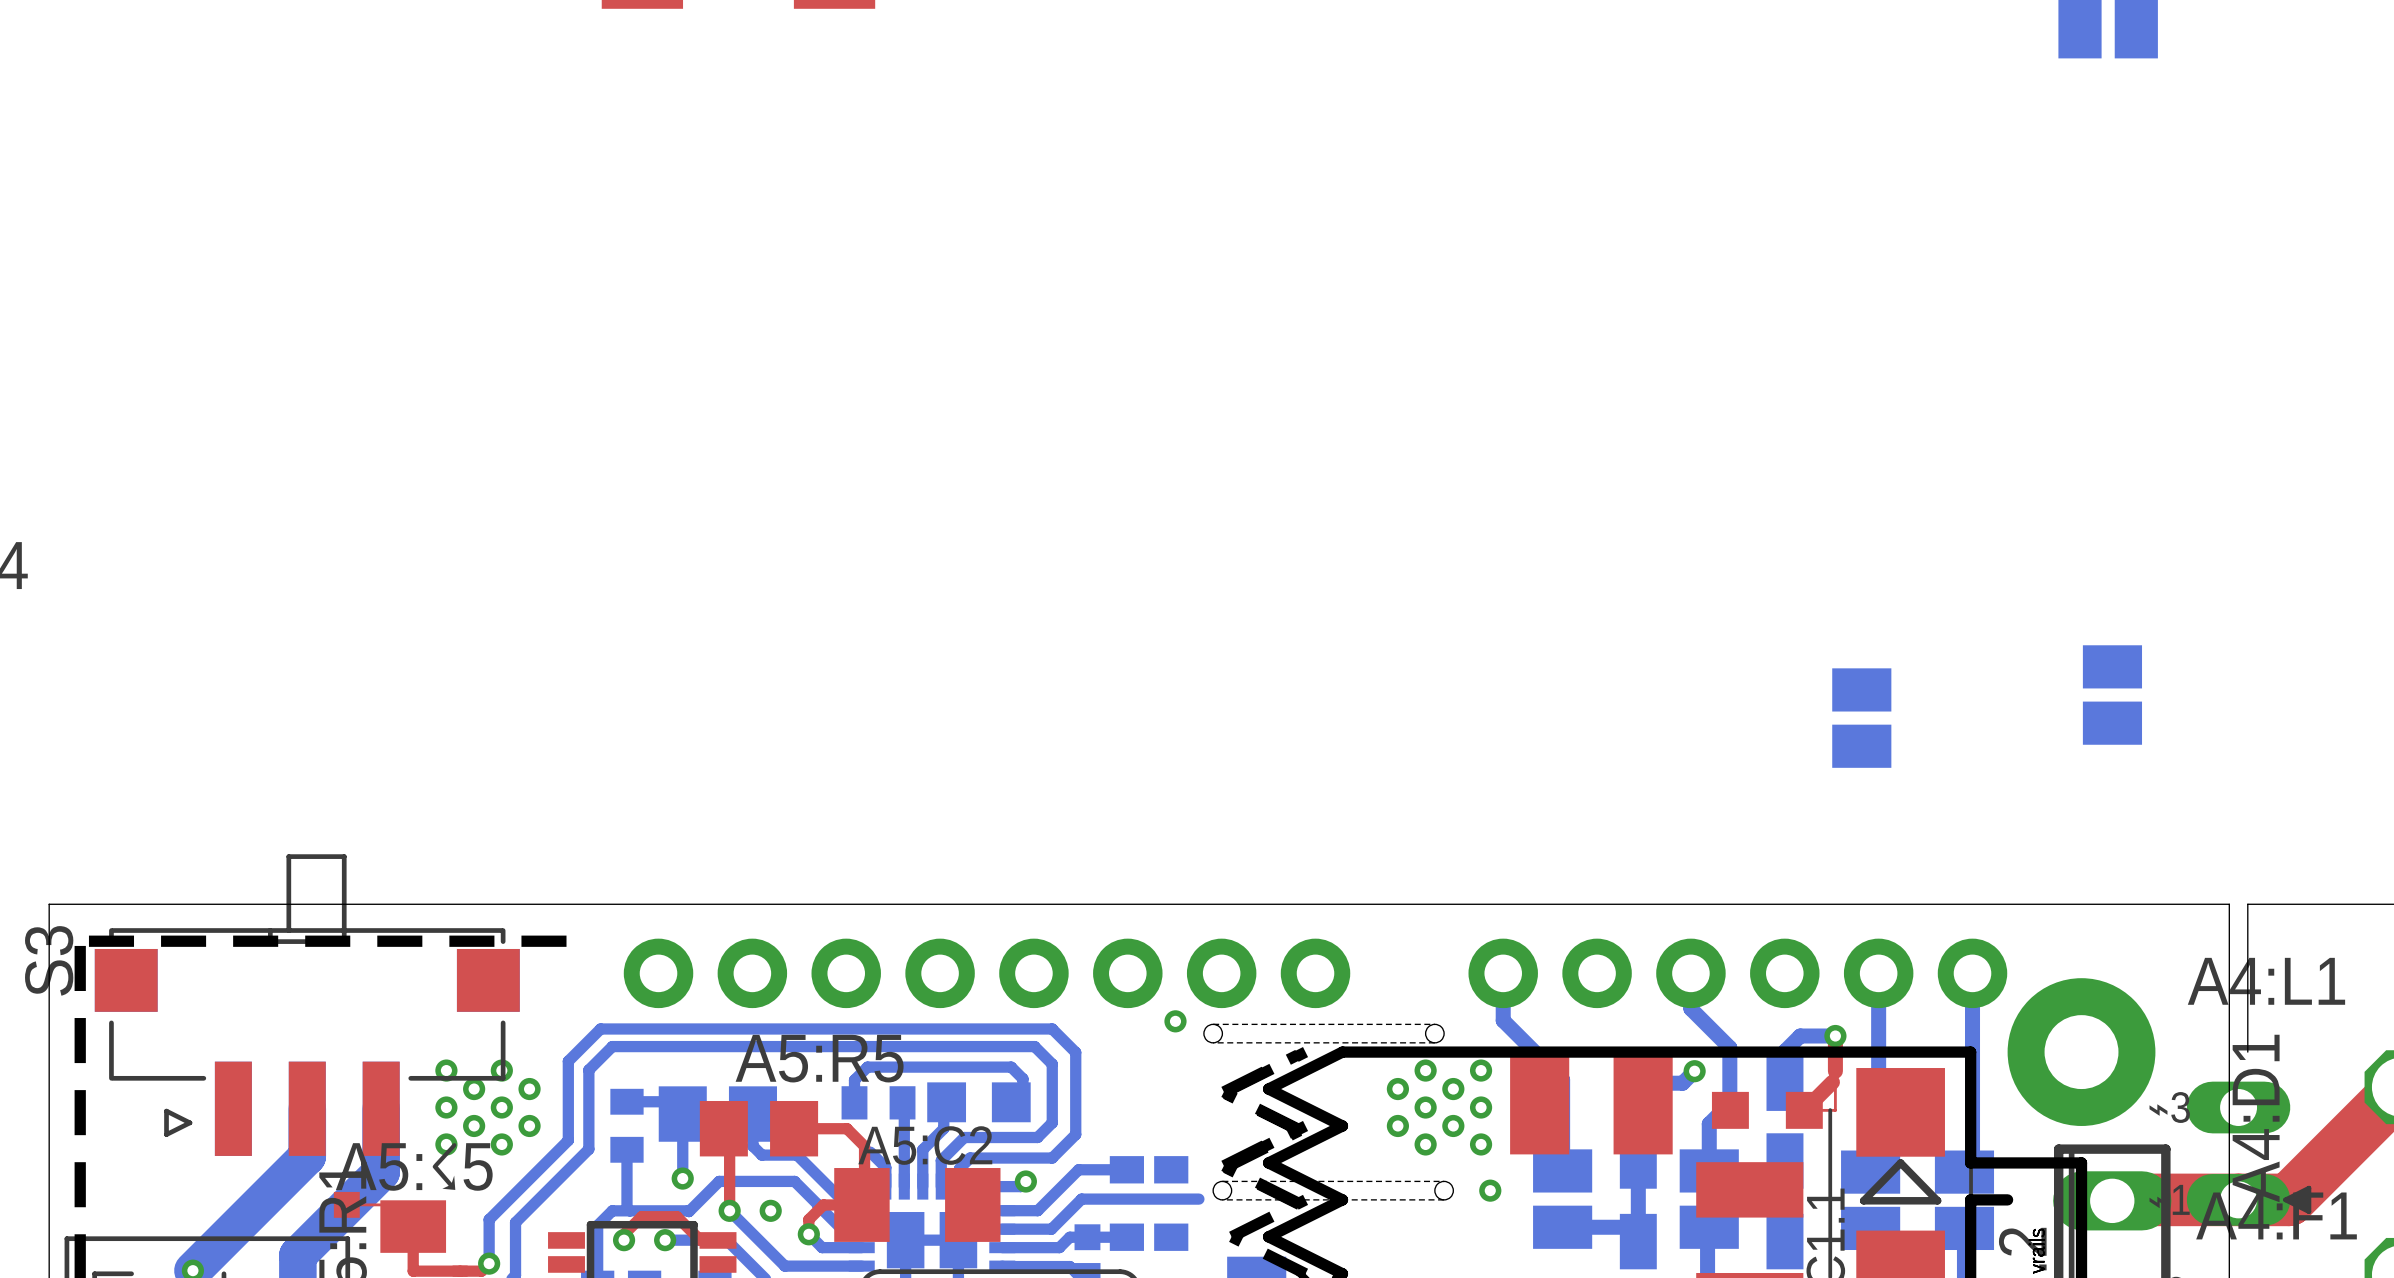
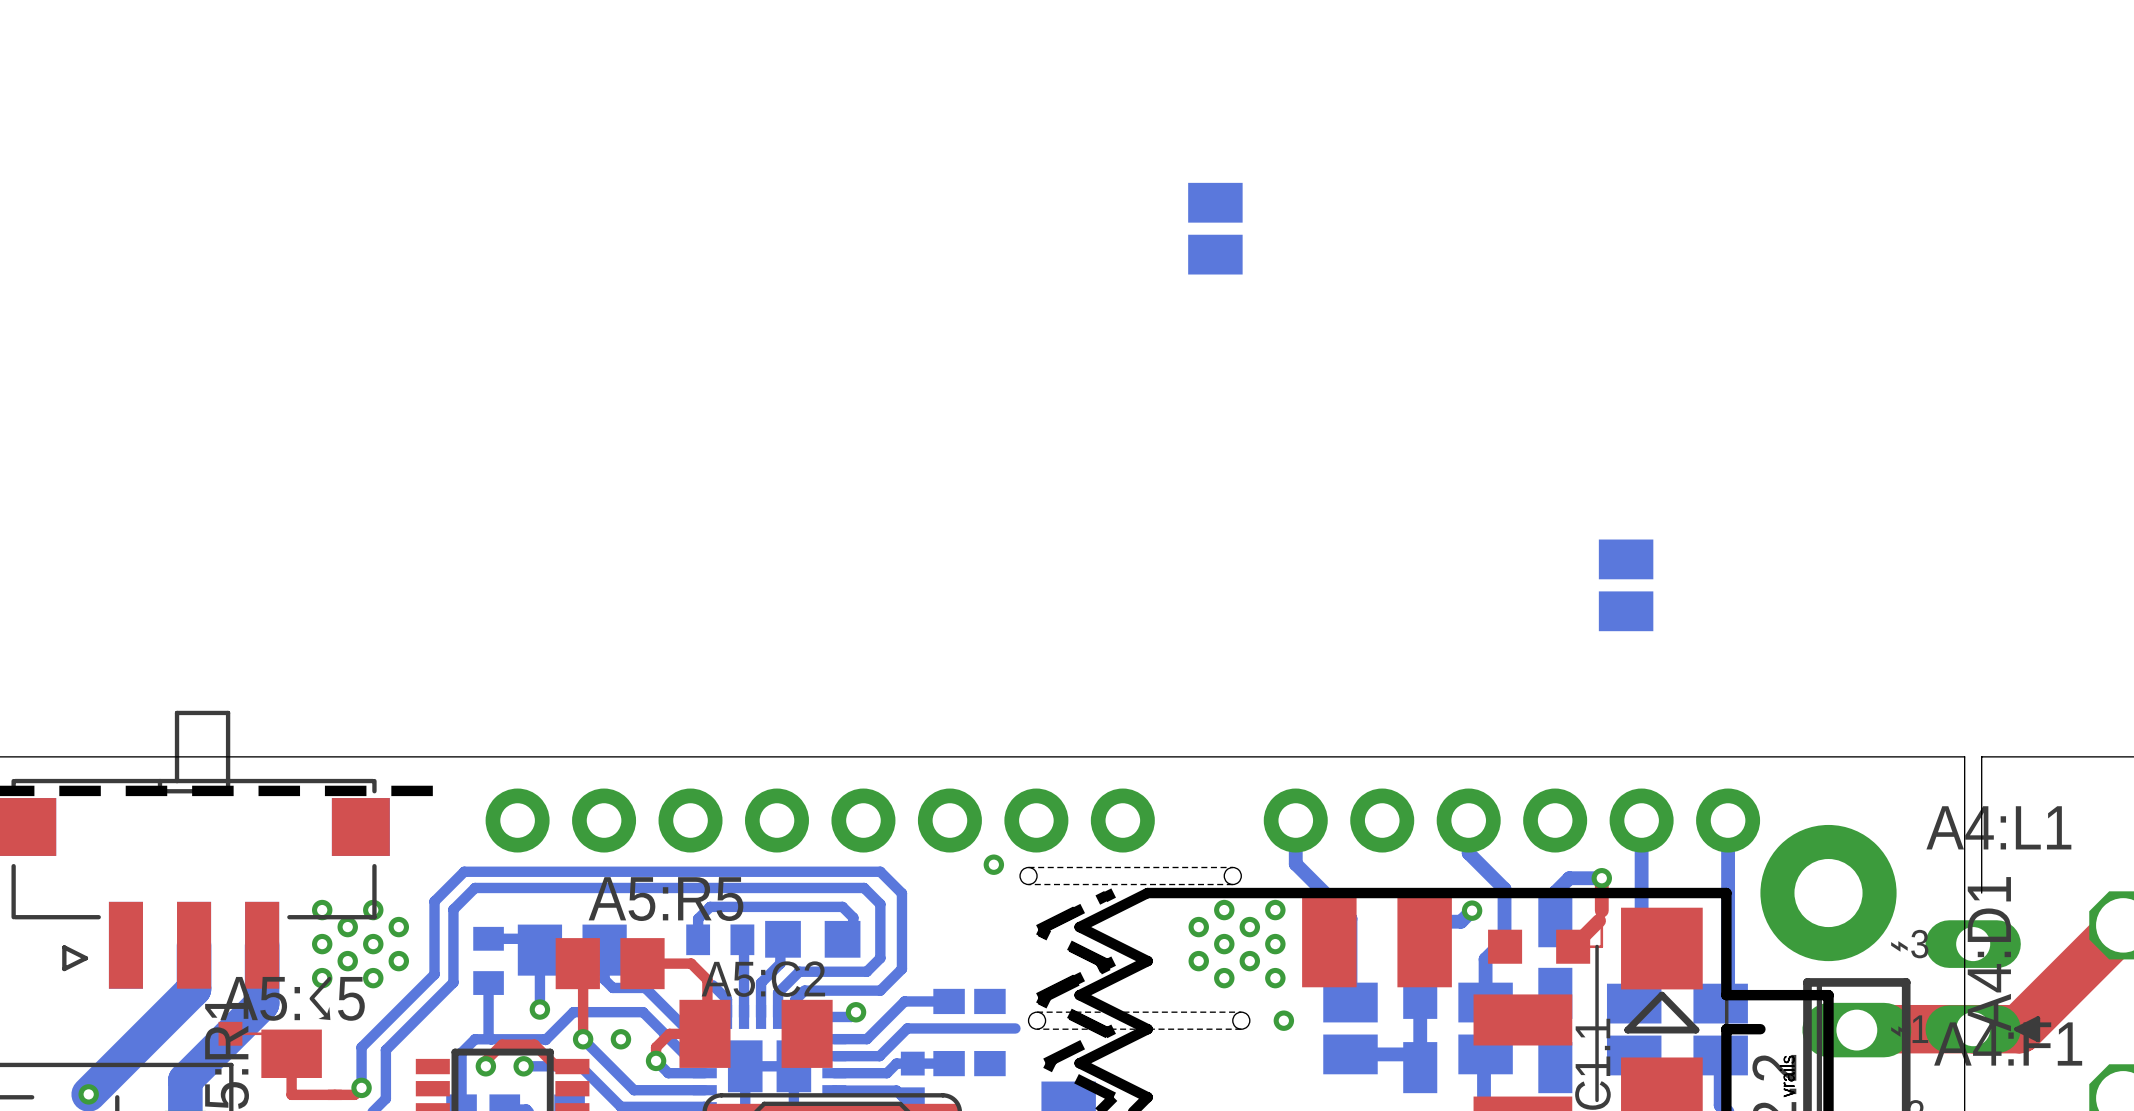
part position: (2112, 695) -> (1215, 228)

